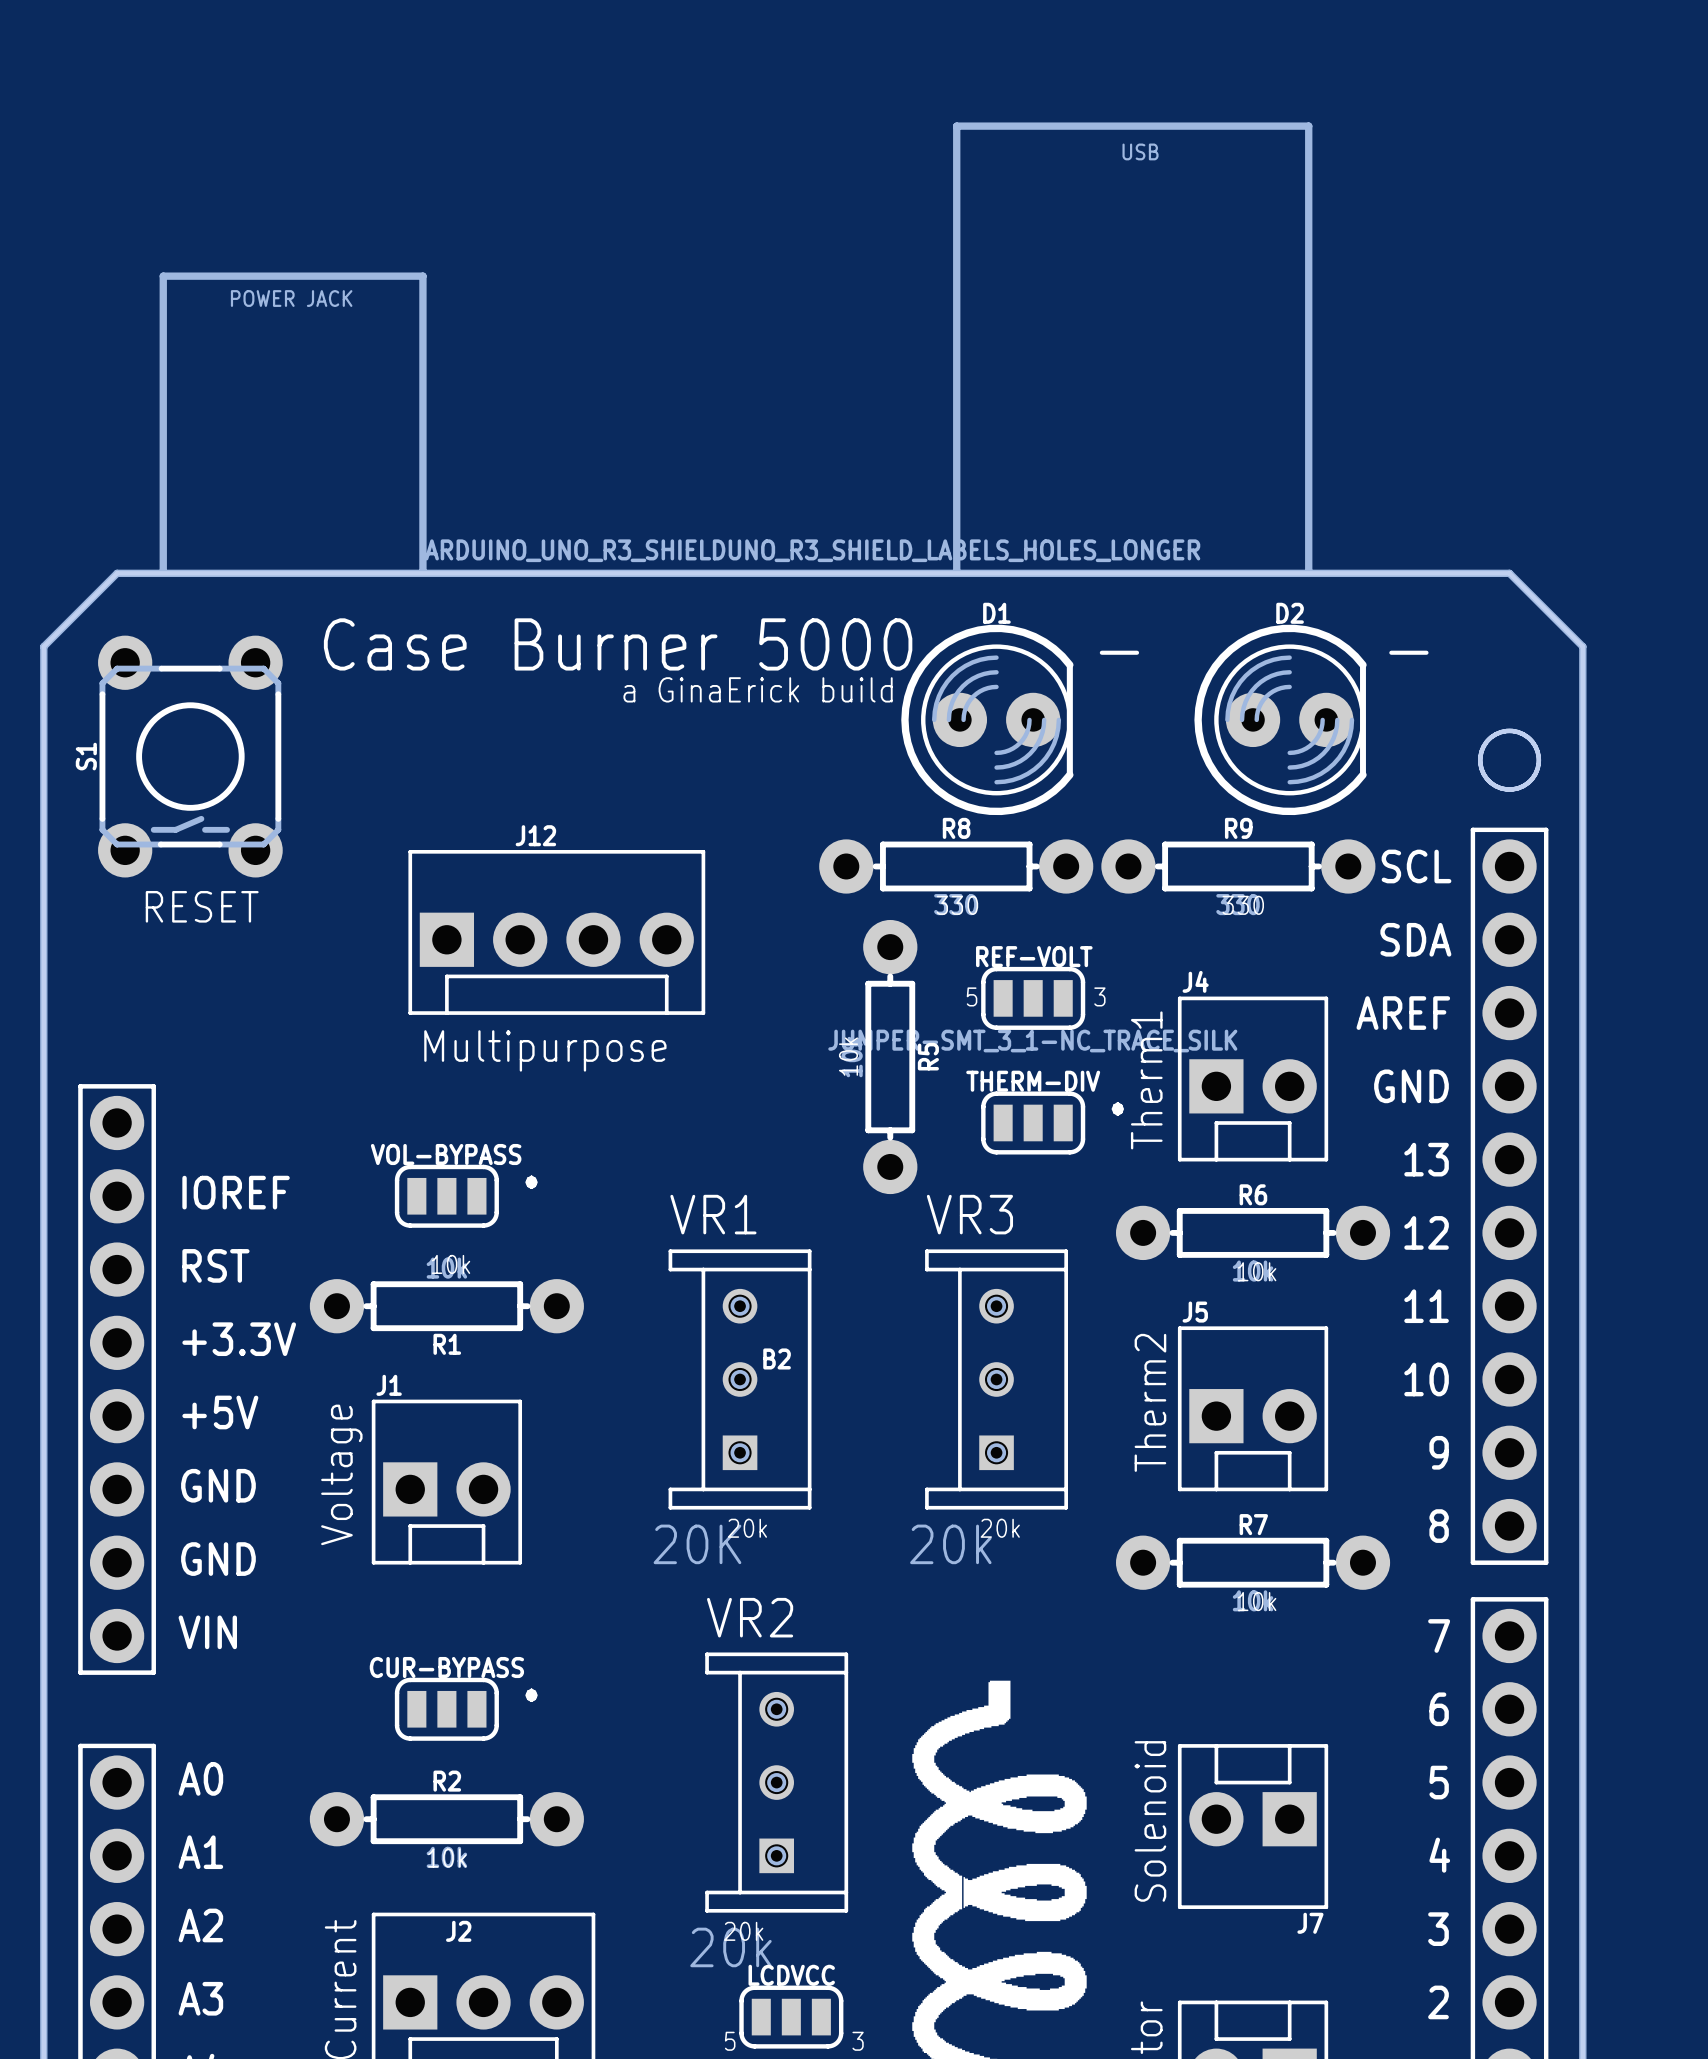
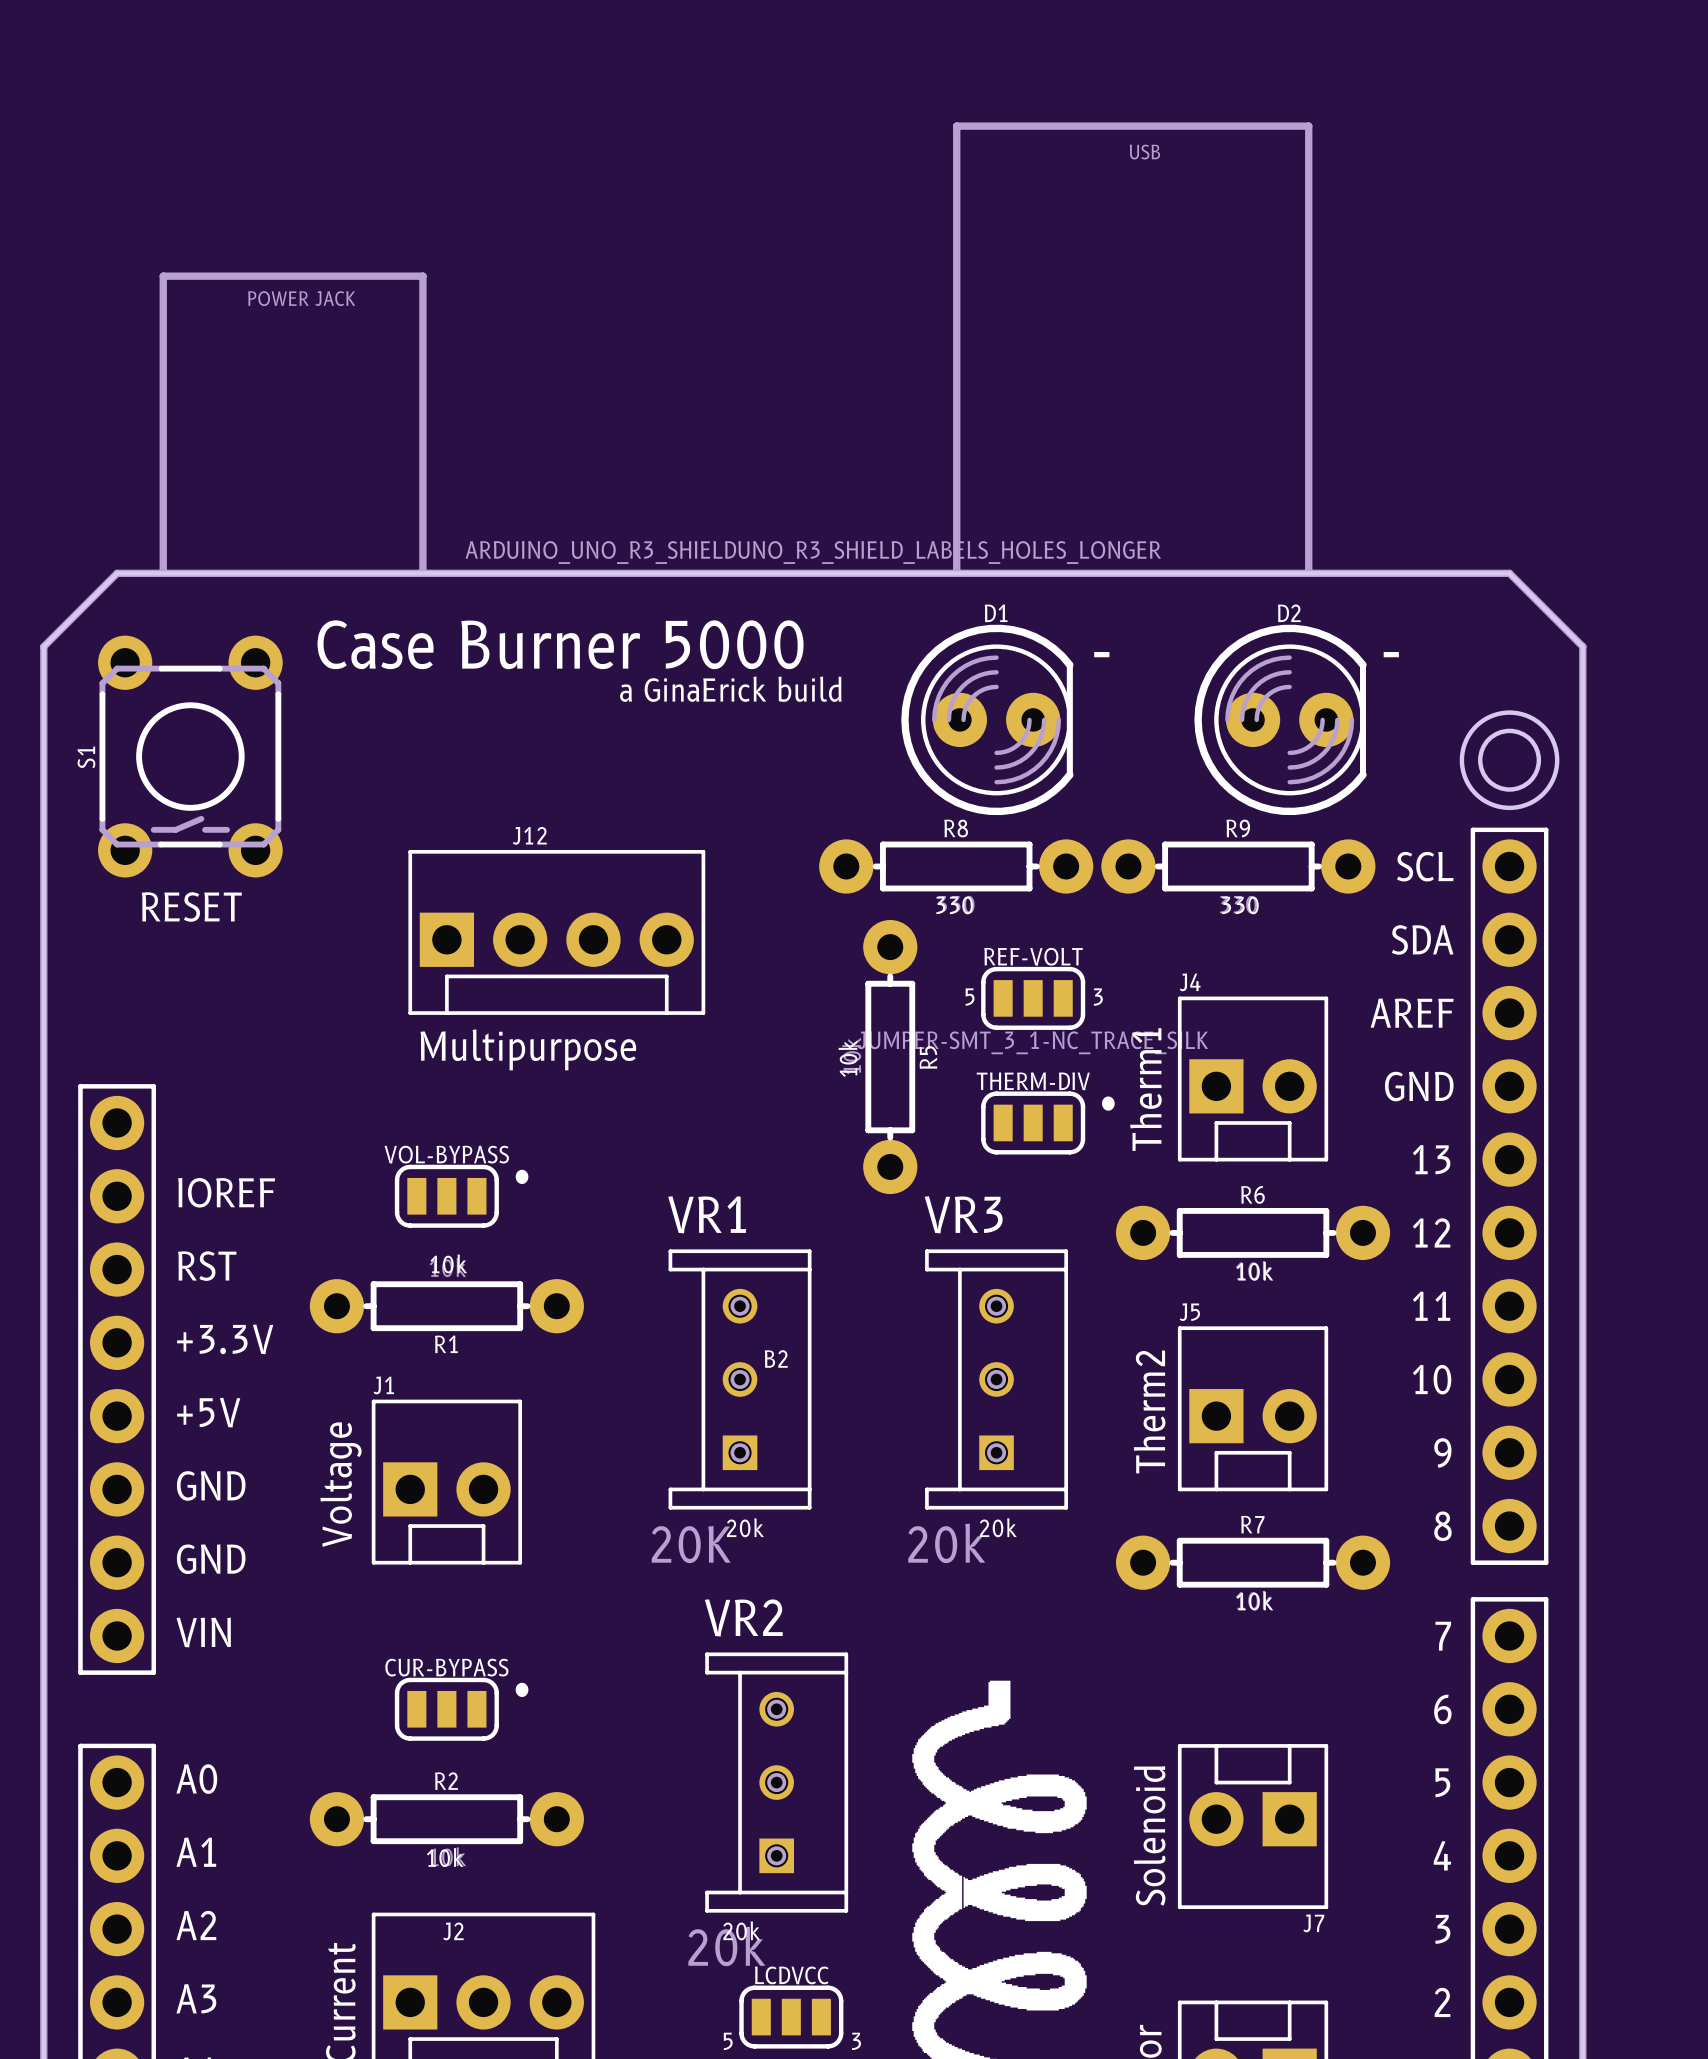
round board edge size: [1478, 728, 1542, 792] -> [1459, 710, 1560, 811]

